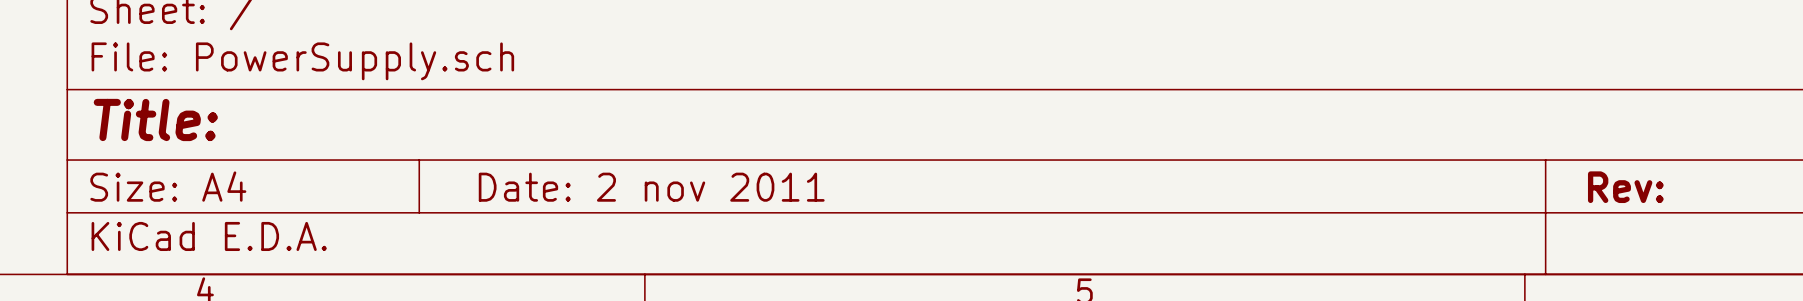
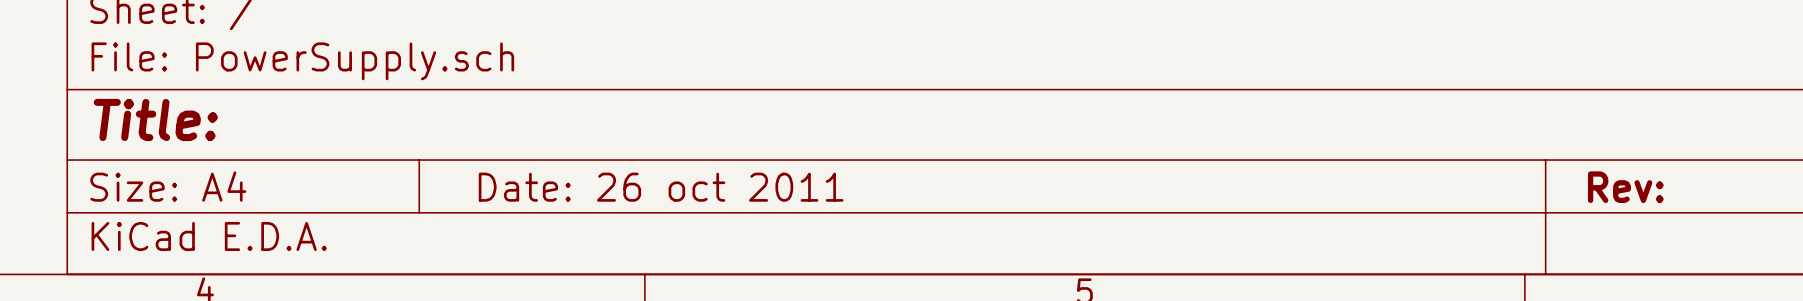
title block: Date: 2 nov 2011 (651, 187) -> Date: 26 oct 2011 (661, 187)

